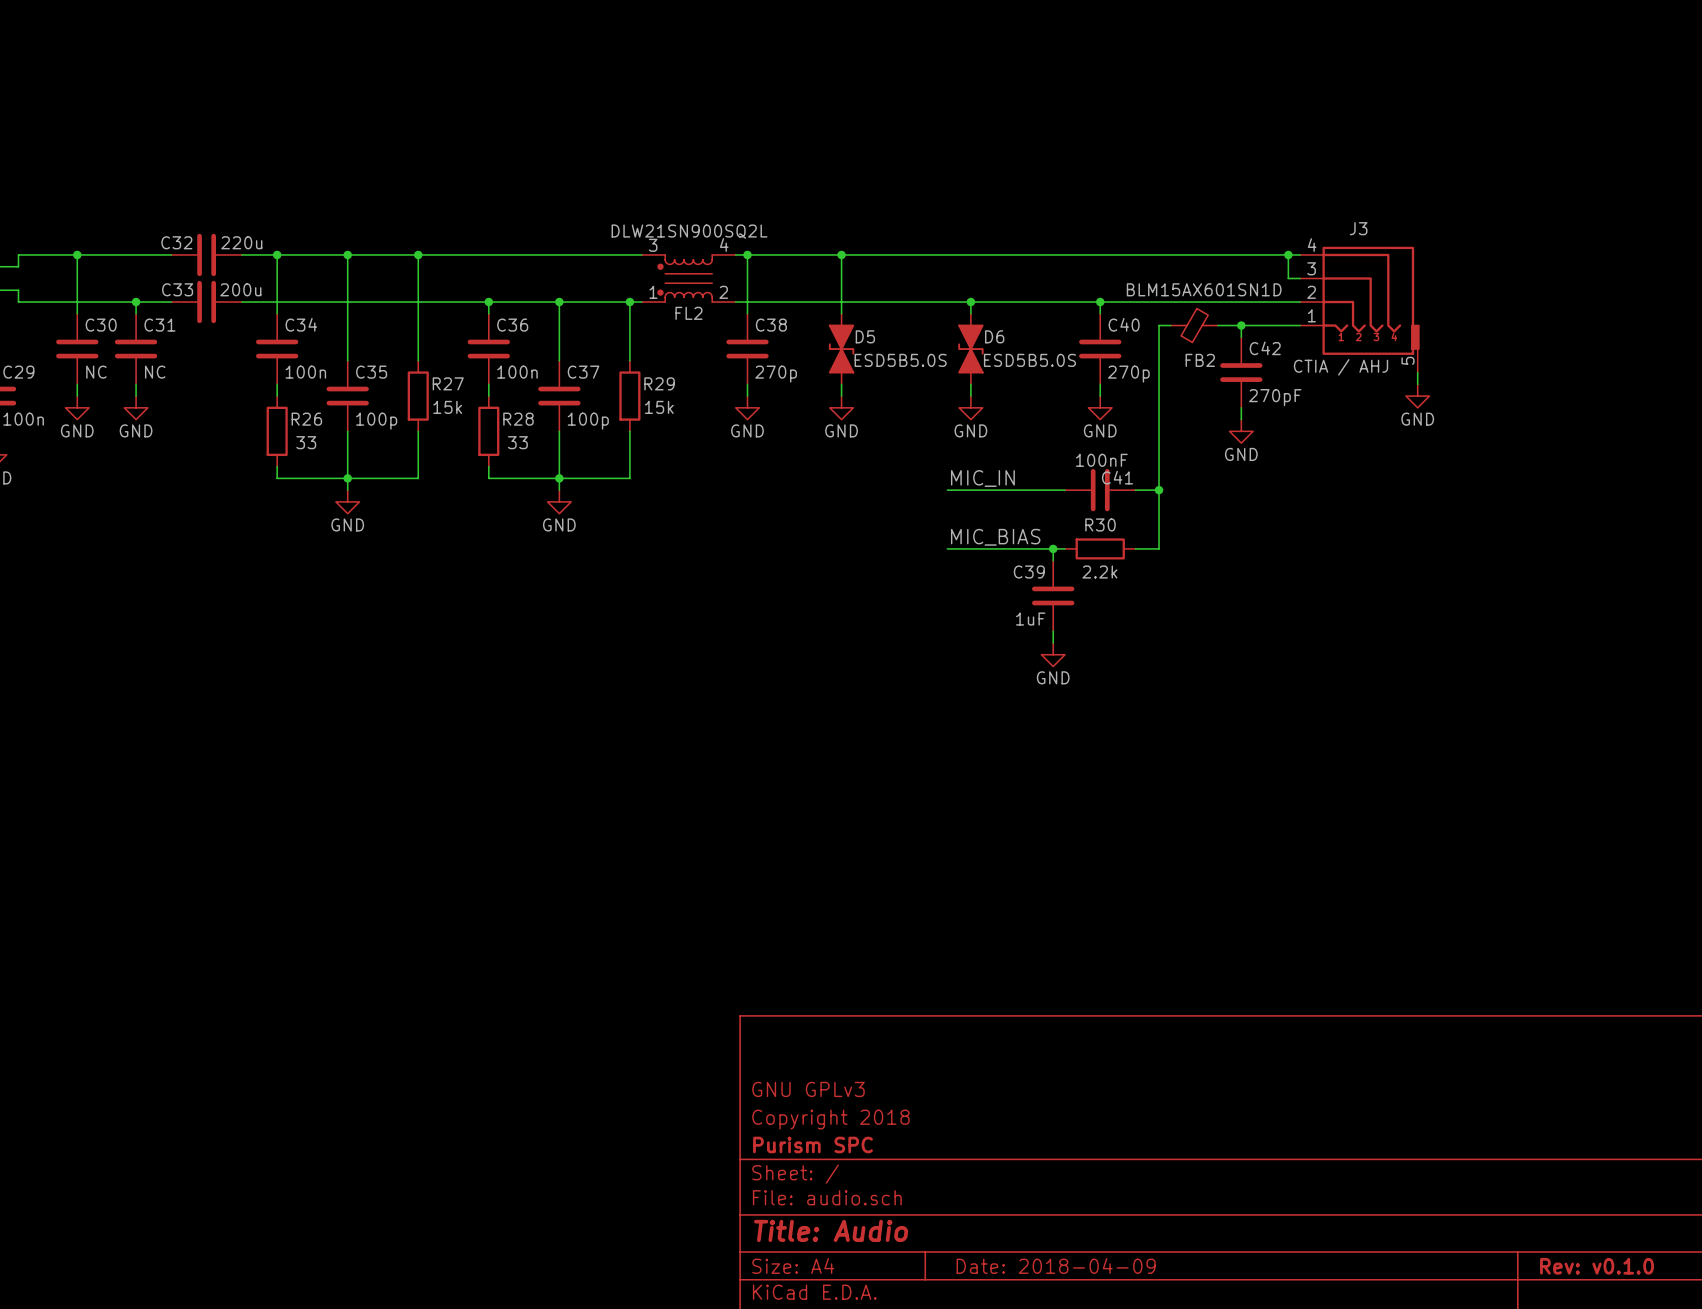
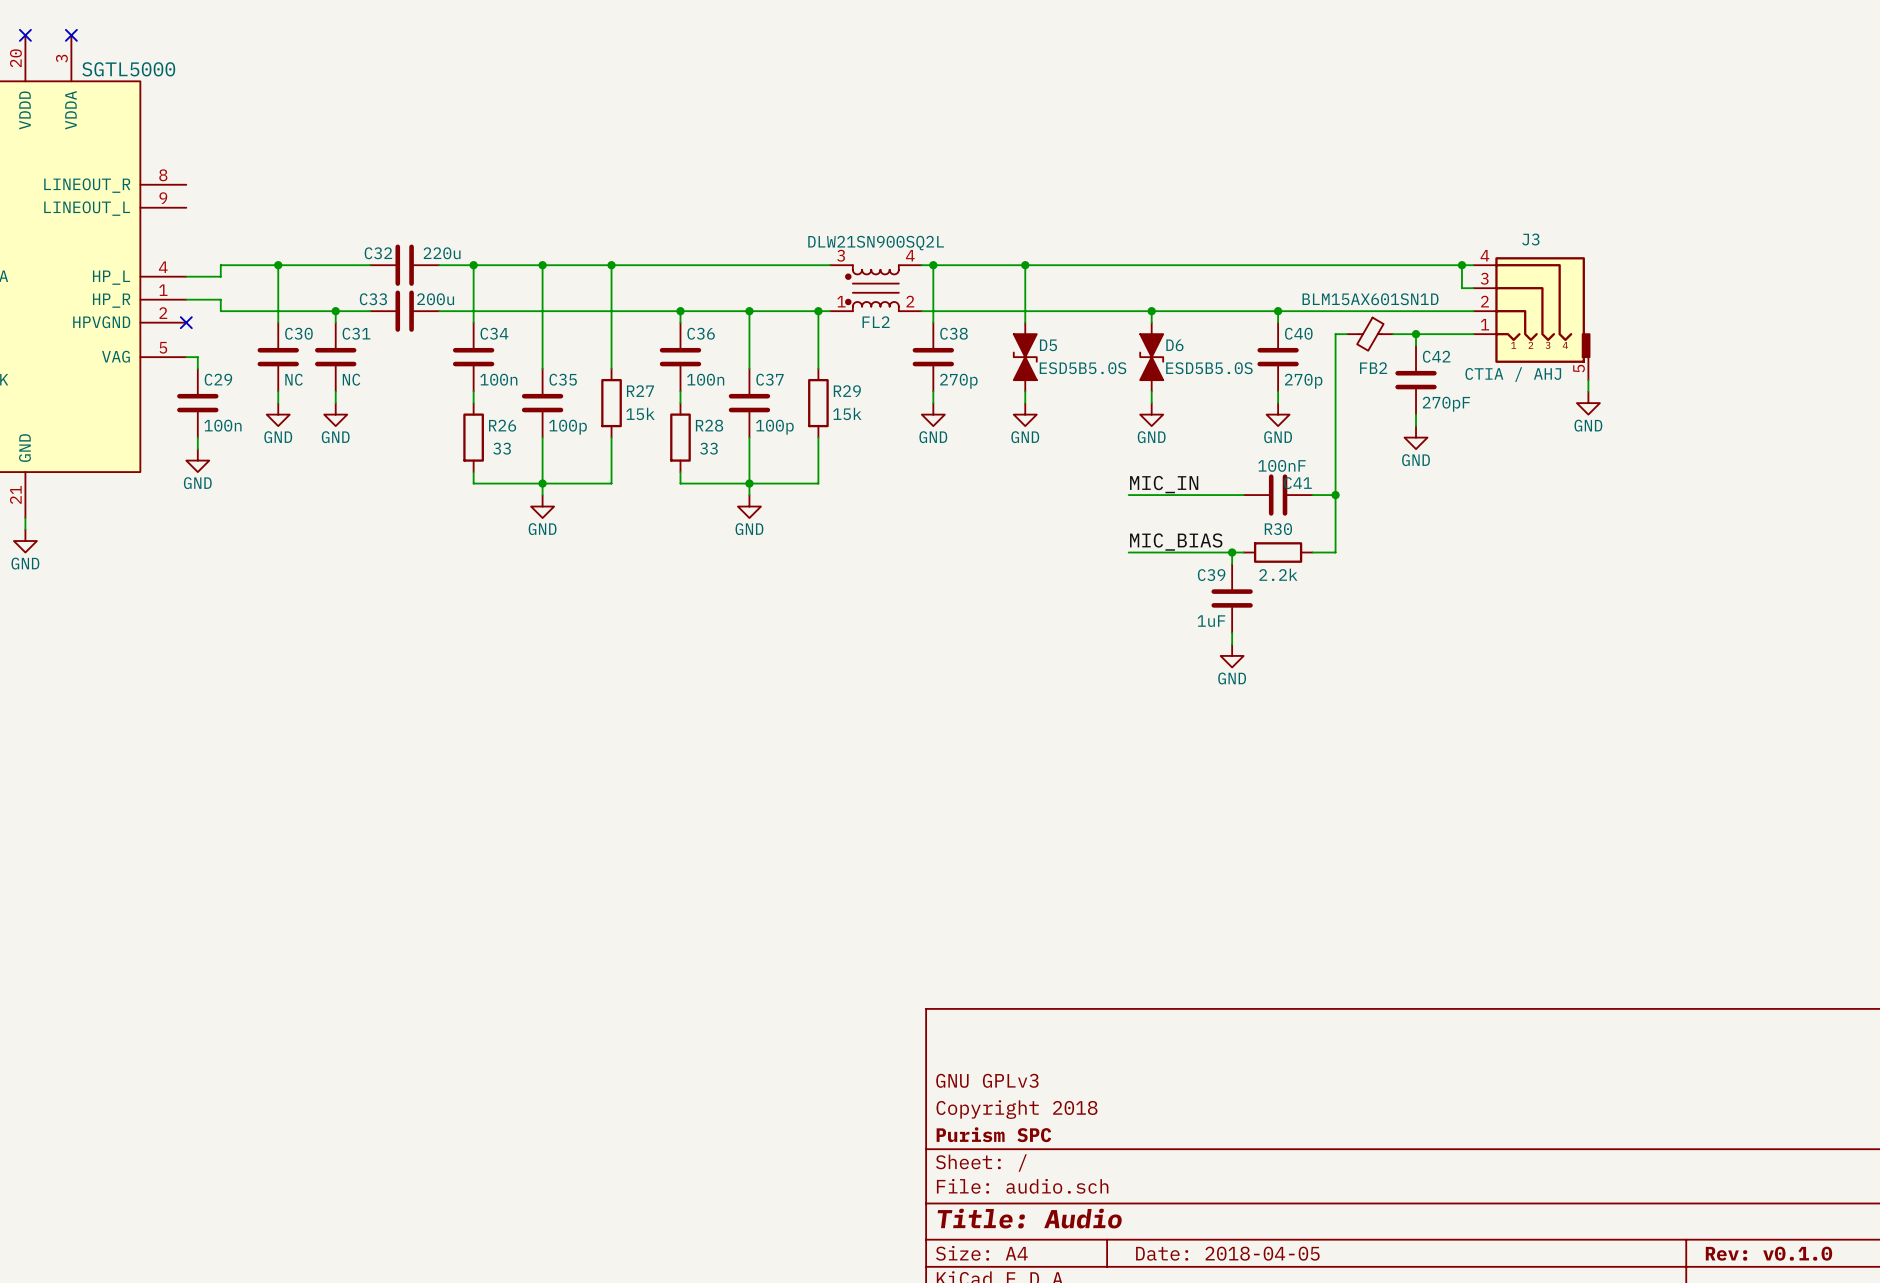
title block: Date: 2018-04-09 (1056, 1265) -> Date: 2018-04-05 (1227, 1253)

